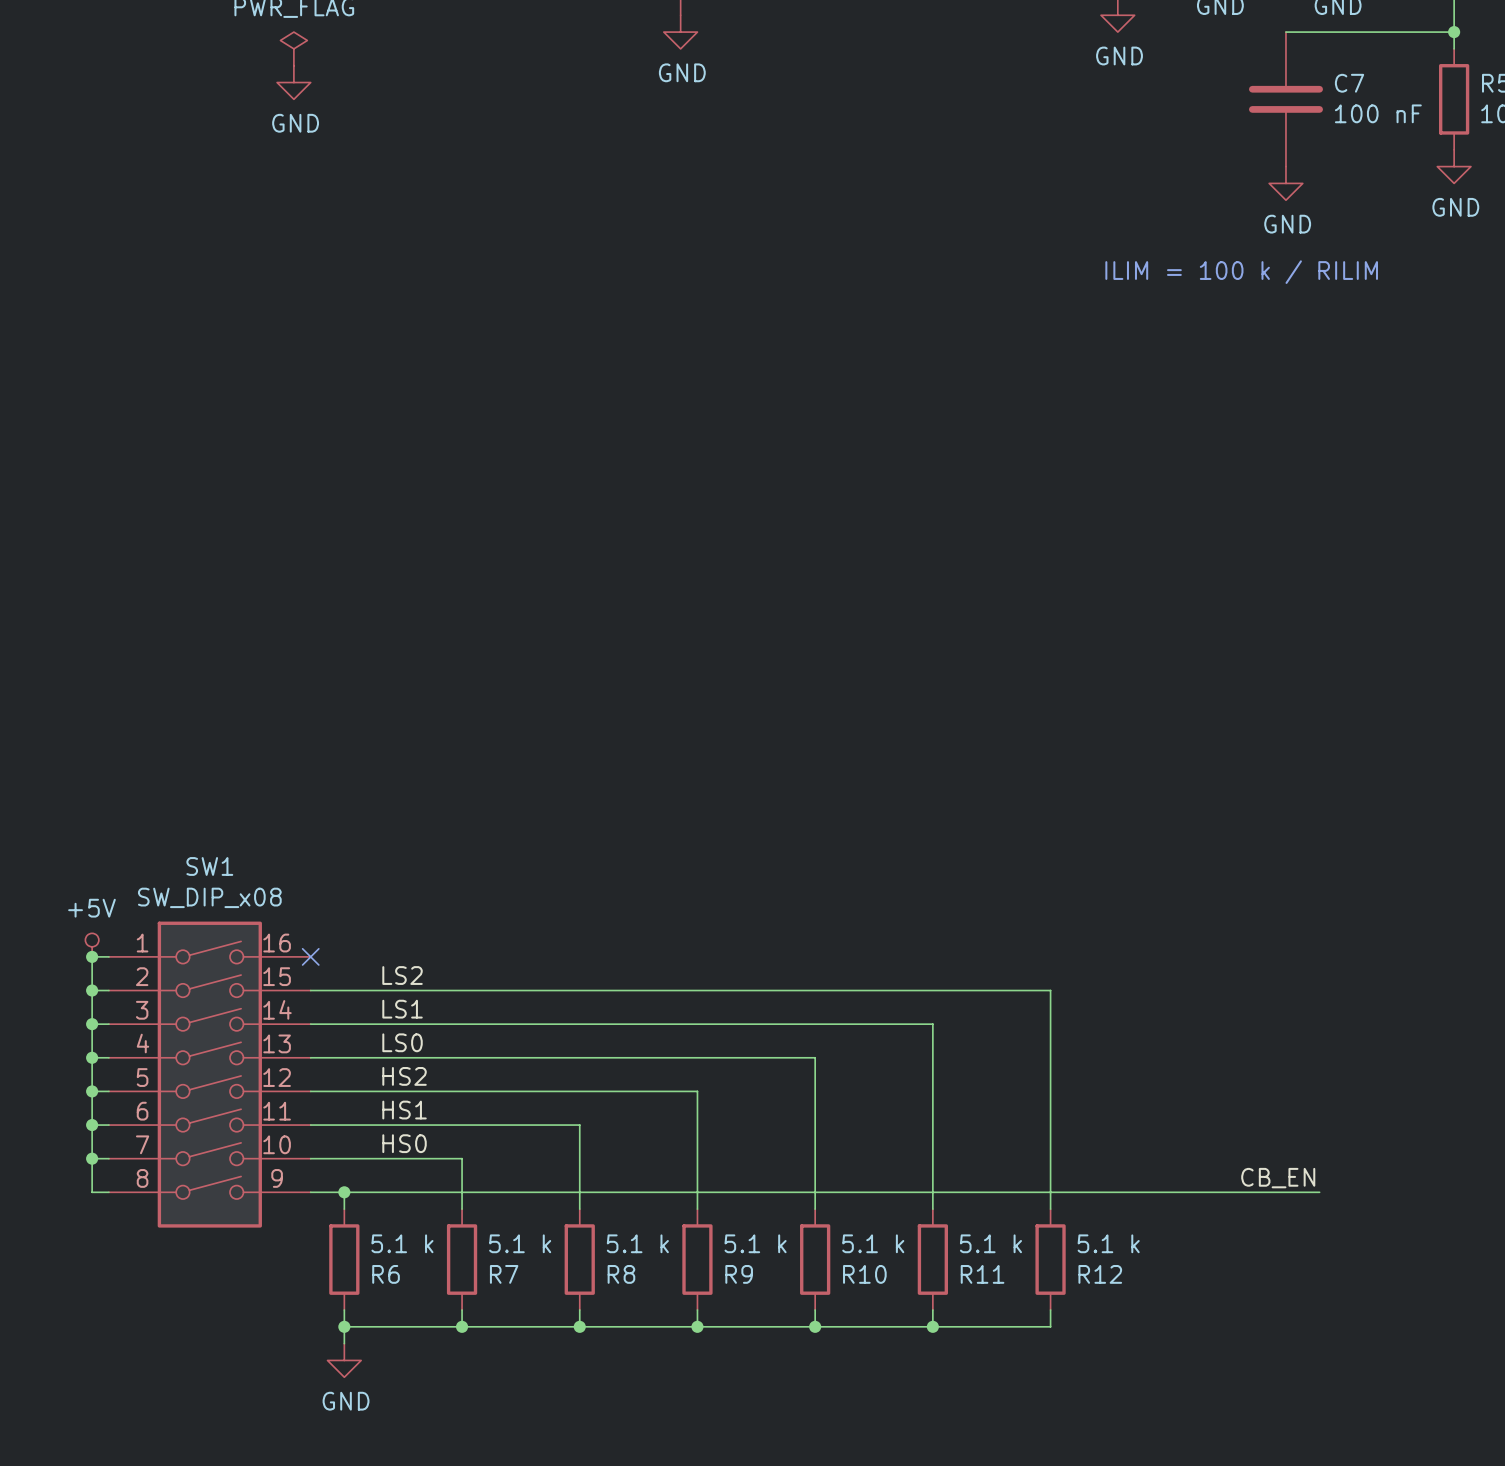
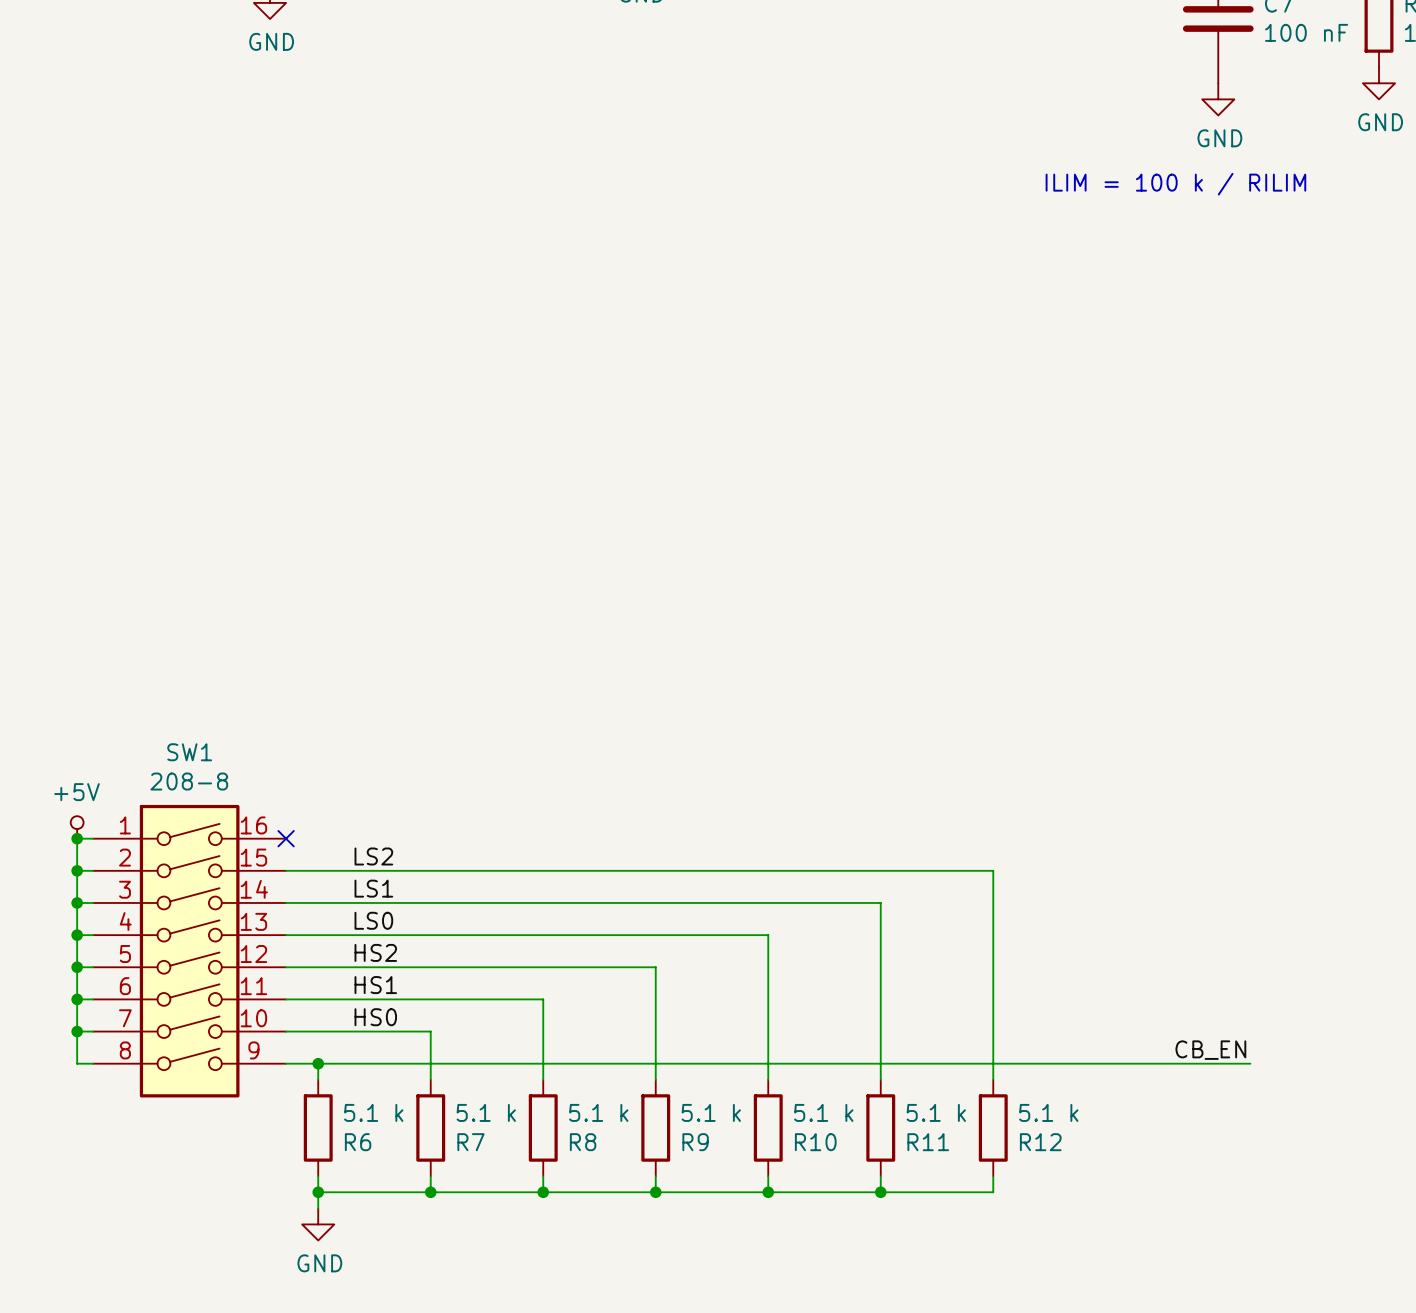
SW1 value: SW_DIP_x08 (209, 897) -> 208-8 (189, 781)

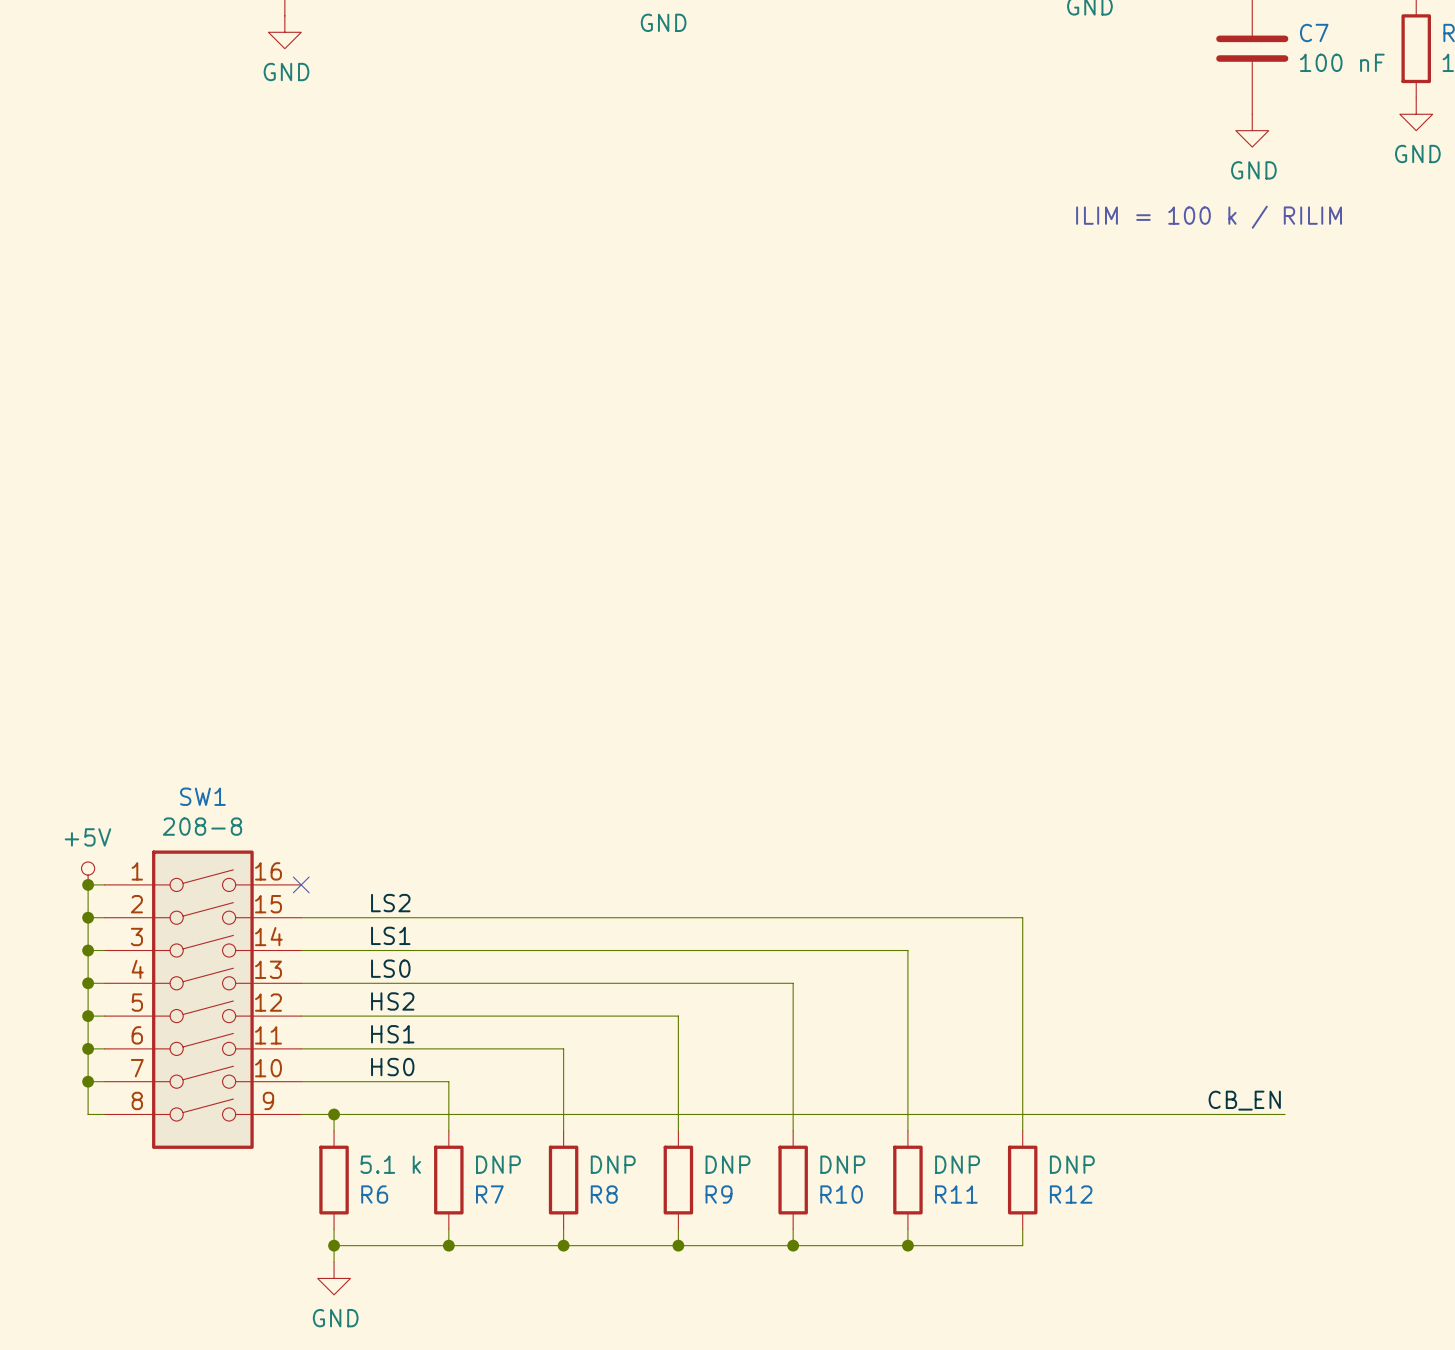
R7 value: 5.1 k (486, 1112) -> DNP (498, 1164)
R8 value: 5.1 k (598, 1112) -> DNP (613, 1164)
R9 value: 5.1 k (711, 1112) -> DNP (728, 1164)
R10 value: 5.1 k (823, 1112) -> DNP (842, 1164)
R11 value: 5.1 k (936, 1112) -> DNP (957, 1164)
R12 value: 5.1 k (1048, 1112) -> DNP (1072, 1164)

